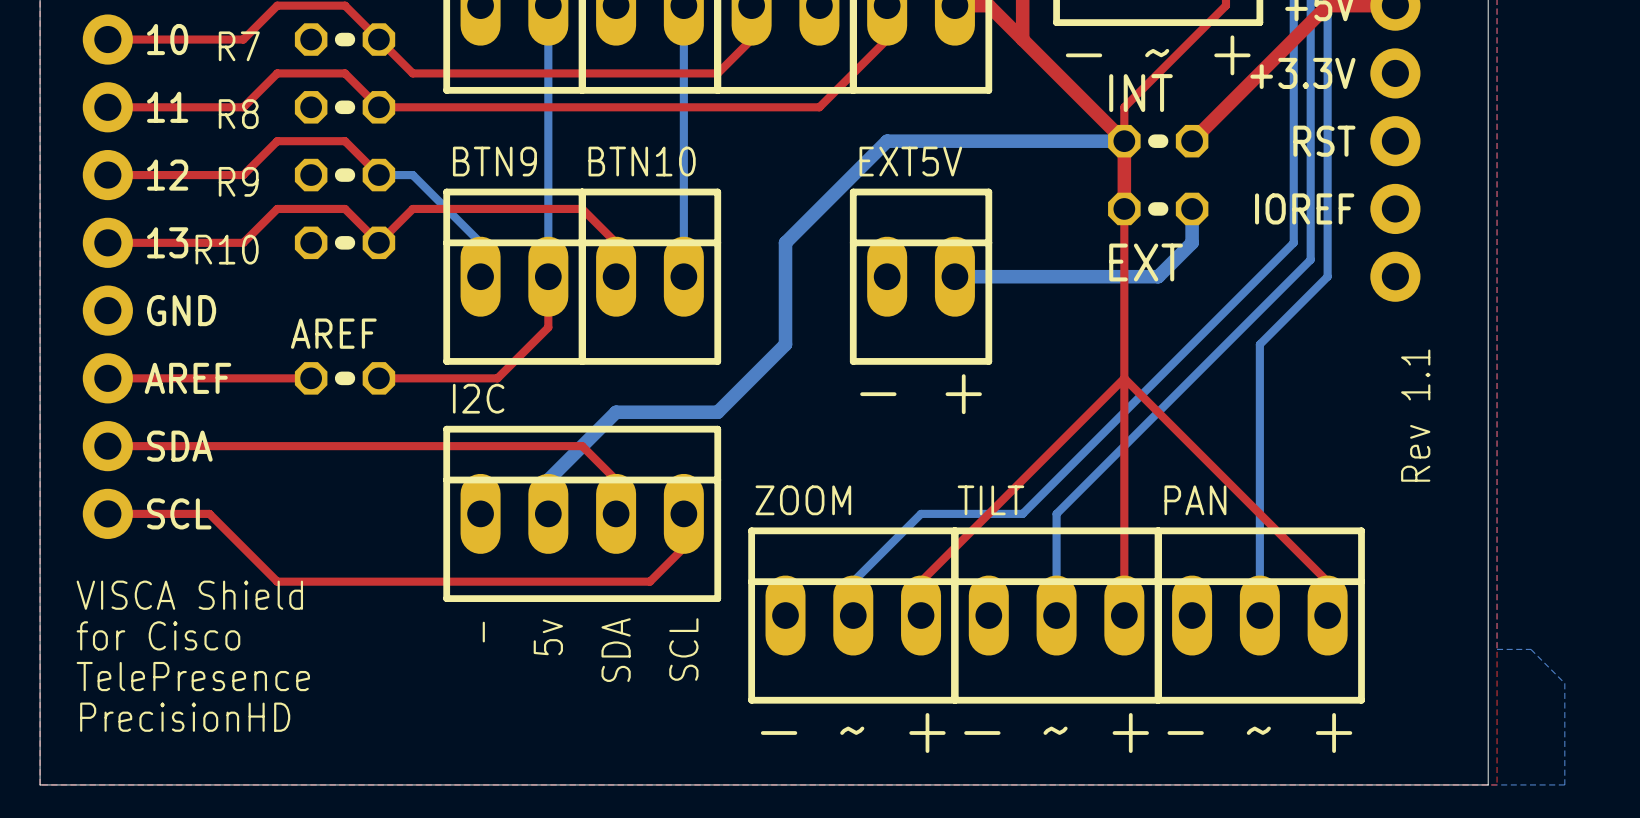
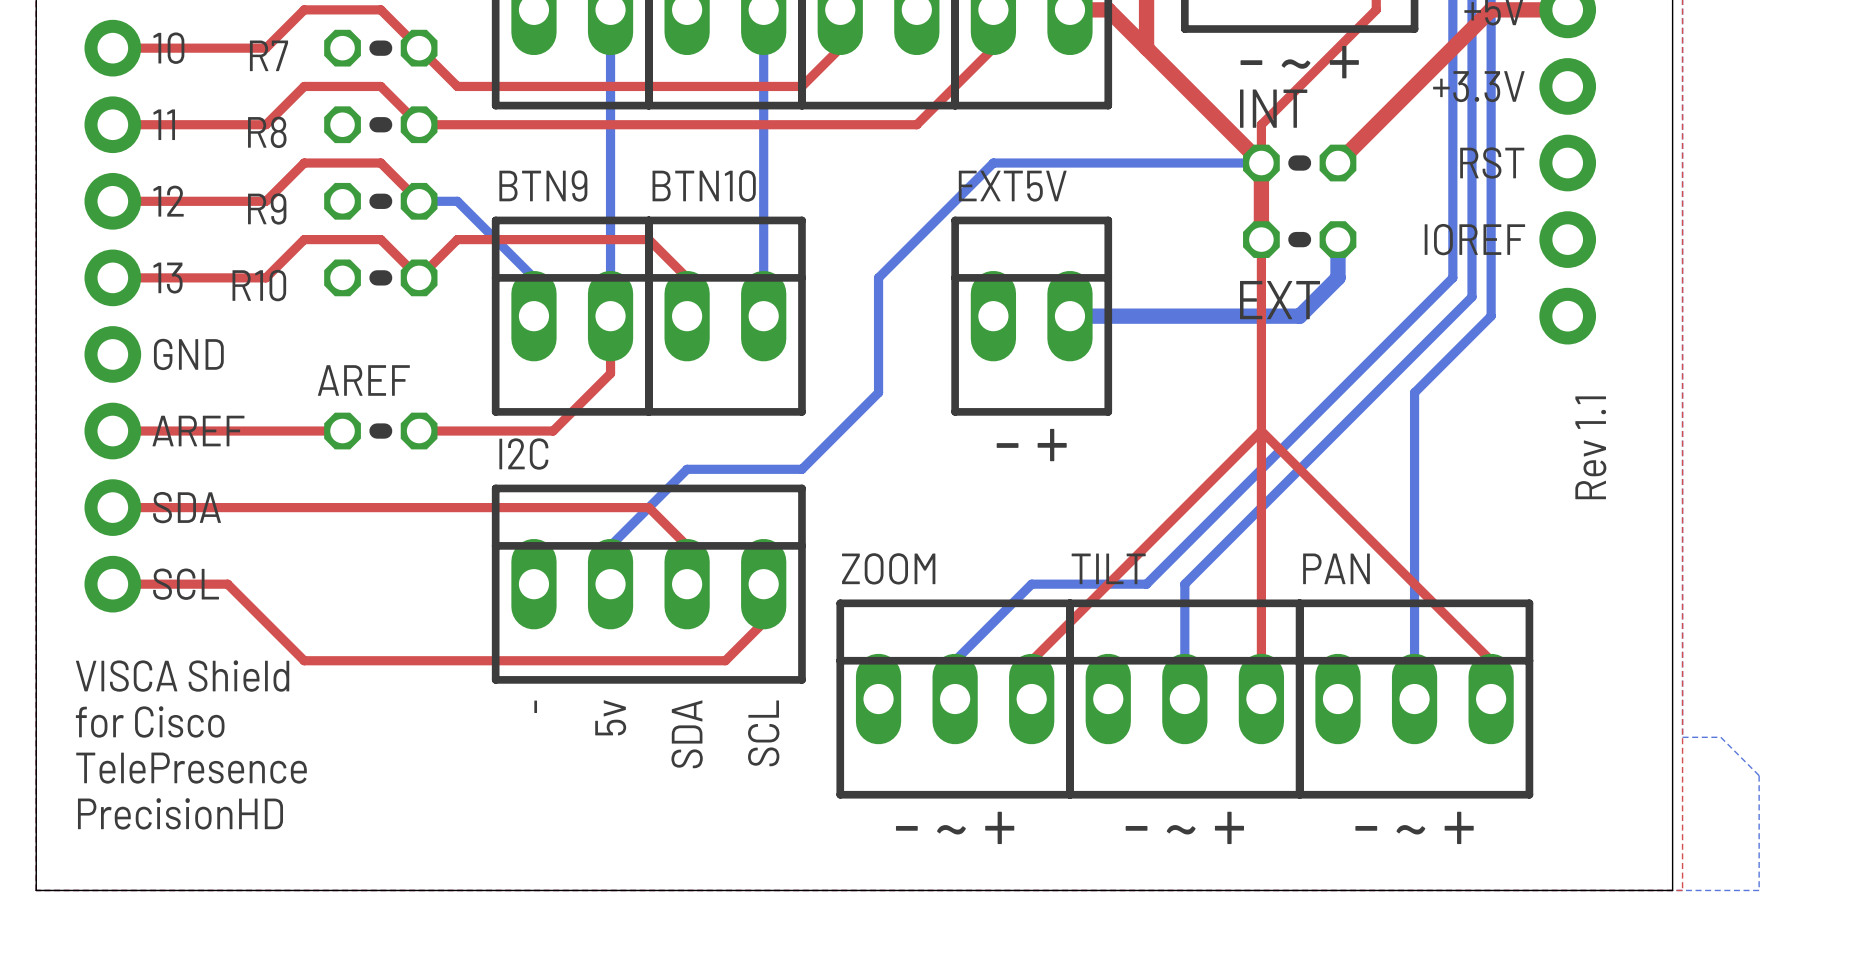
bottom track width: thick (1124, 141) (887, 141) (785, 242) (785, 344) (717, 412) (616, 412) (548, 480) (548, 513) -> thin (1261, 163) (993, 163) (878, 277) (878, 392) (801, 469) (687, 469) (610, 545) (610, 584)

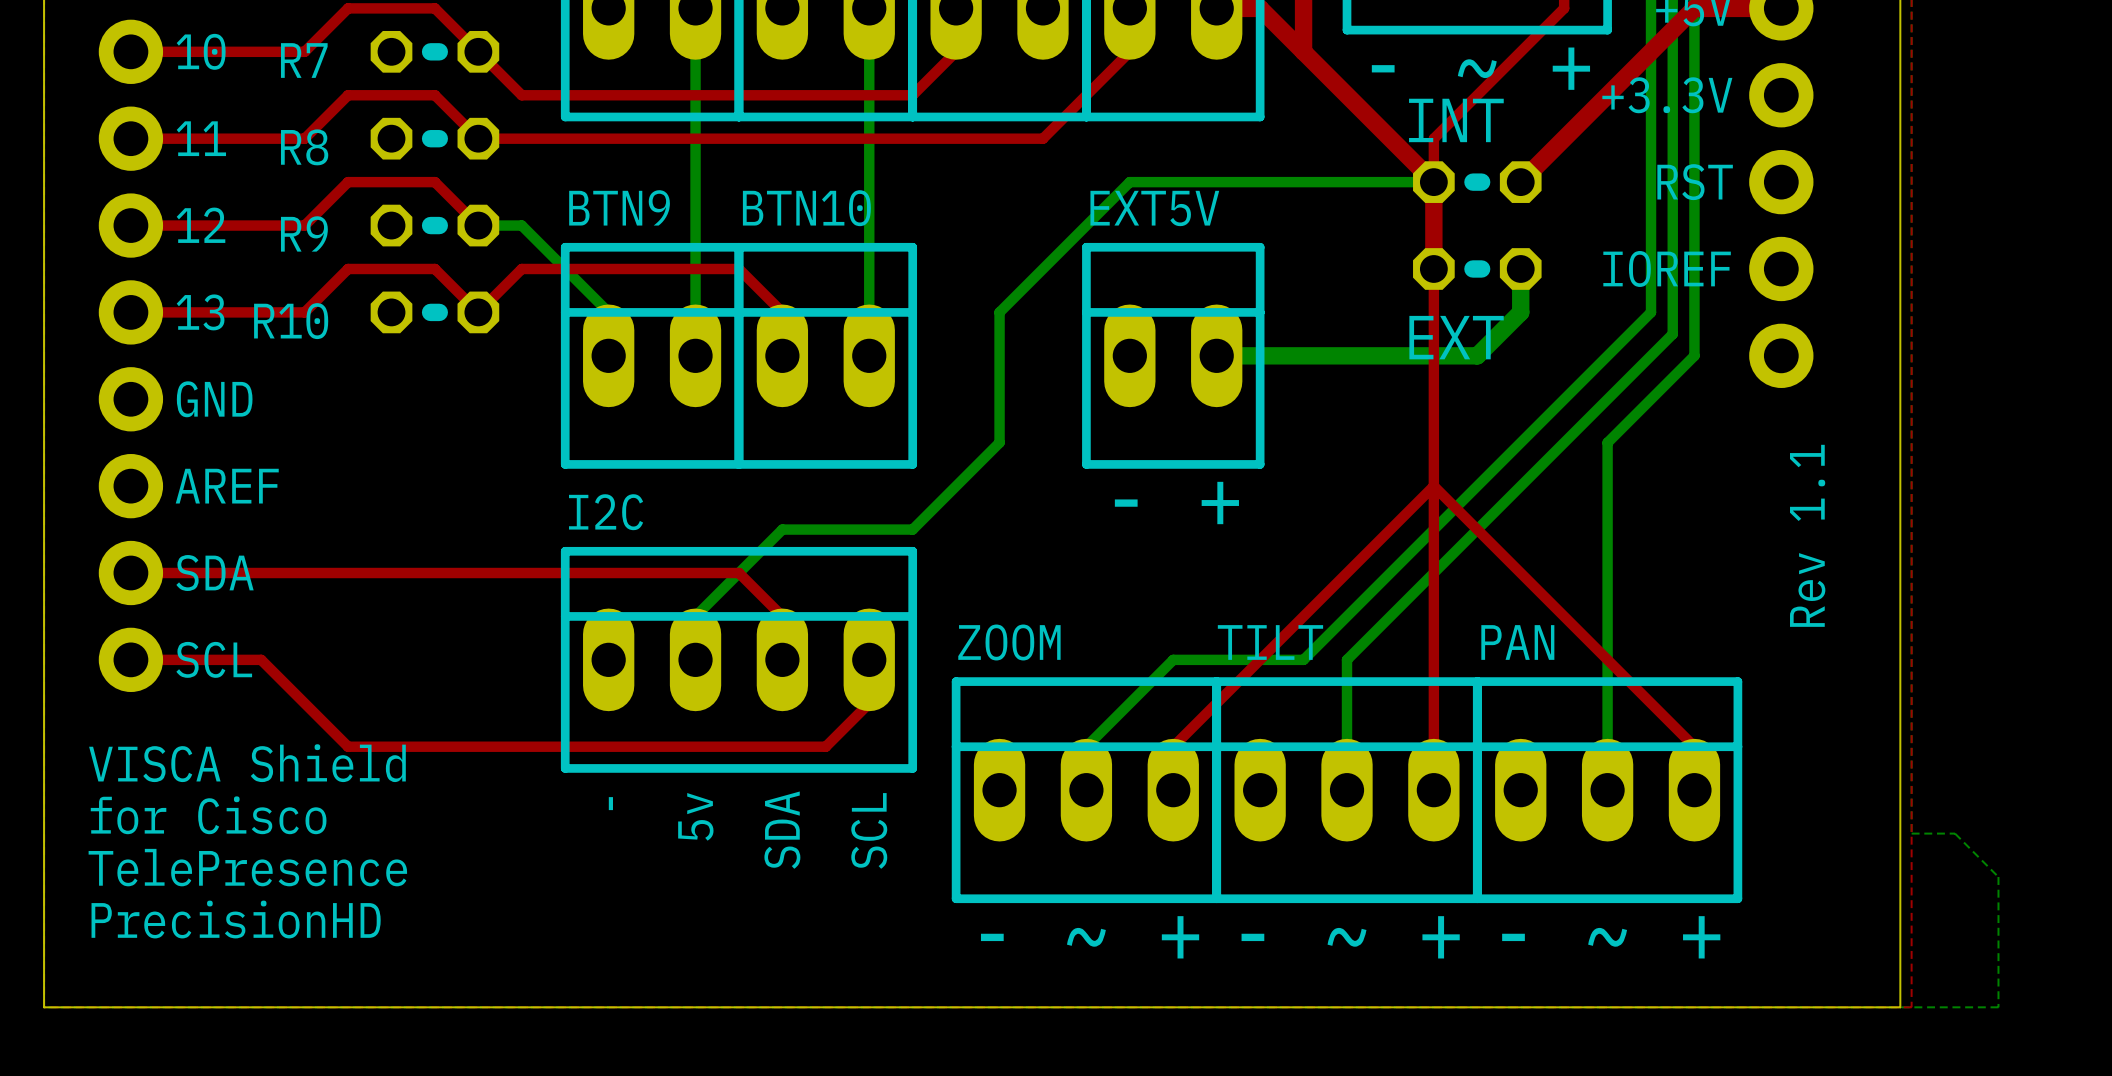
top track: (610, 316) (610, 373) (553, 431) (419, 431) -> none
top track: (112, 431) (342, 431) -> none
AREF: (380, 431) -> none

